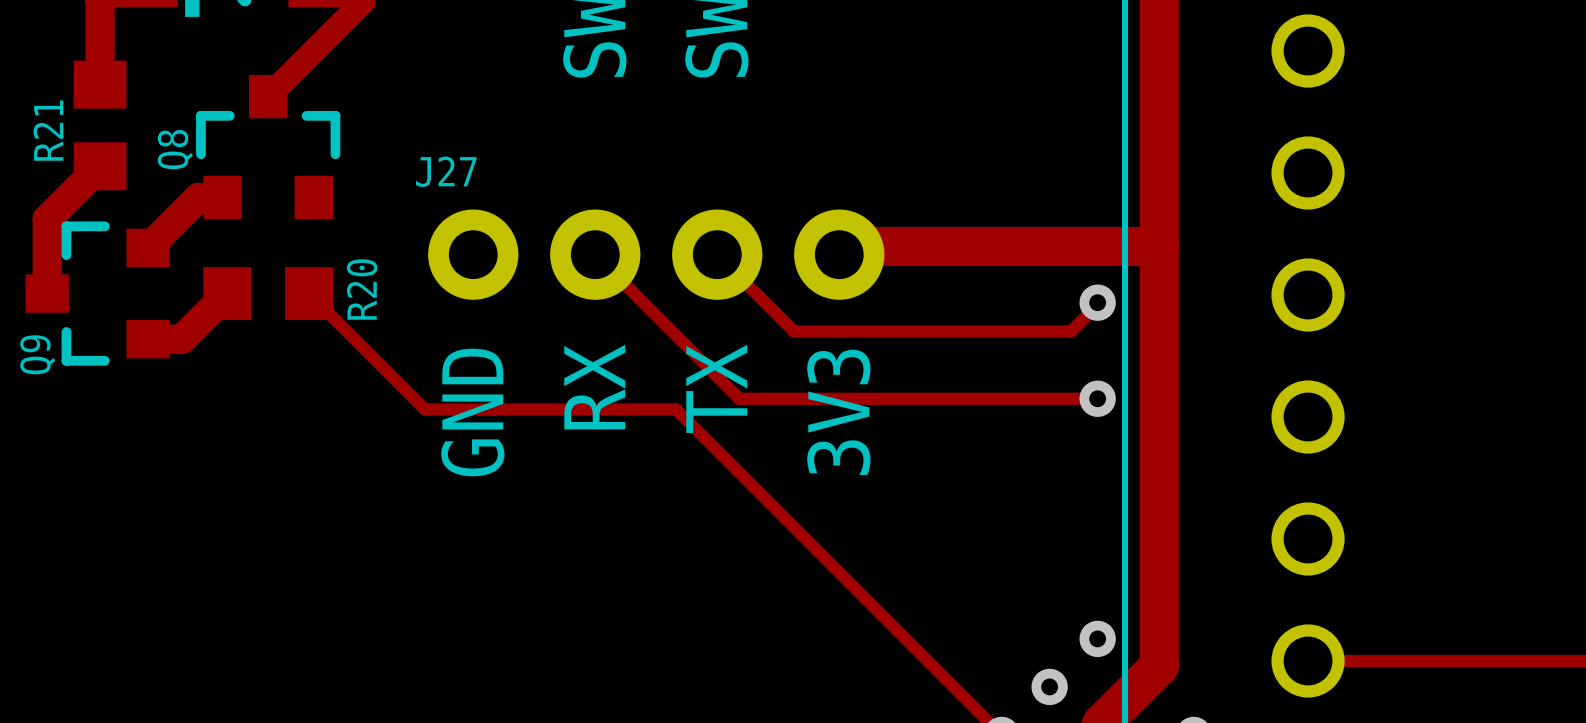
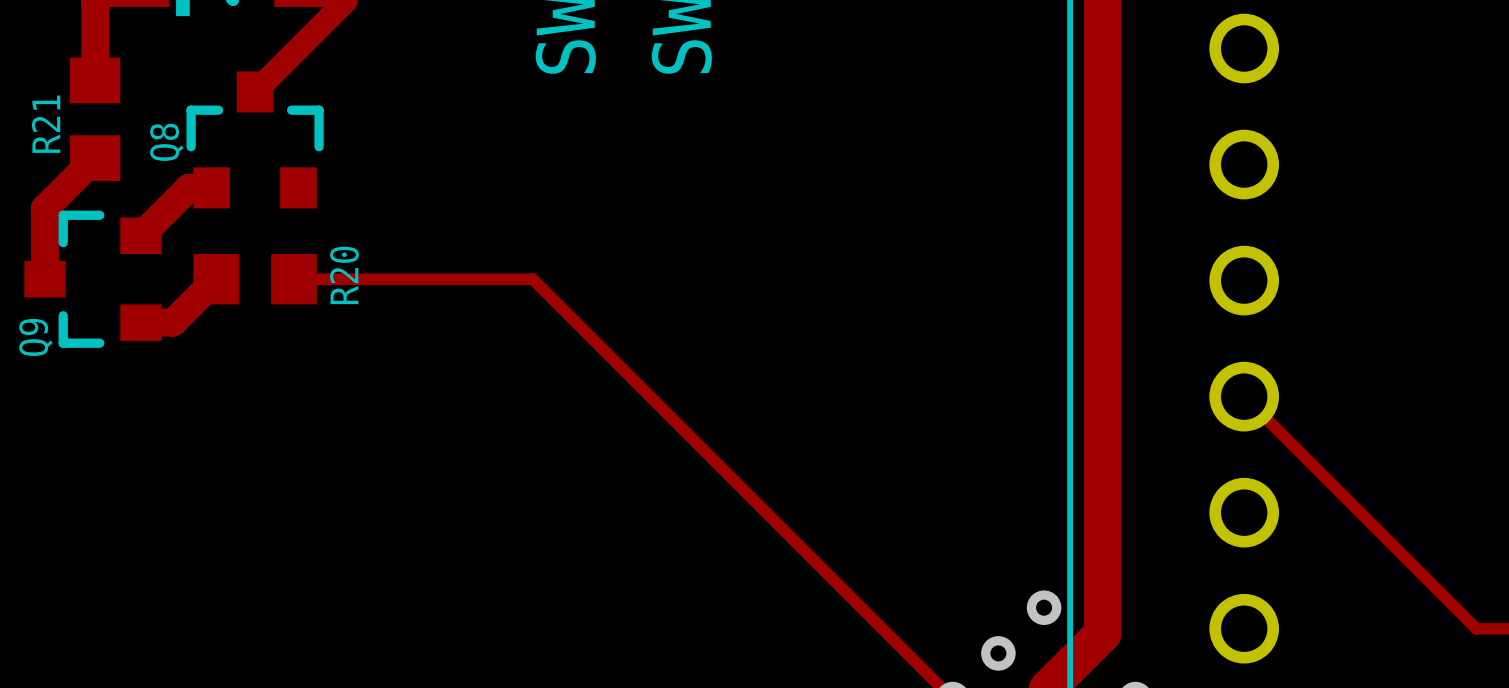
track: (1159, 246) (847, 246) (839, 254) -> none
track: (595, 254) (739, 398) (1097, 398) -> none
J27: (656, 254) -> none
track: (717, 254) (794, 331) (1070, 331) (1097, 302) -> none
track: (309, 293) (424, 409) (676, 409) -> (293, 279) (532, 279) (643, 389)
via: (1097, 302) -> none
text: RX (594, 387) -> none
text: TX (716, 388) -> none
via: (1097, 398) -> none
text: GND (472, 412) -> none
text: 3V3 (838, 412) -> none
track: (1308, 661) (1552, 661) -> (1244, 396) (1476, 628)

